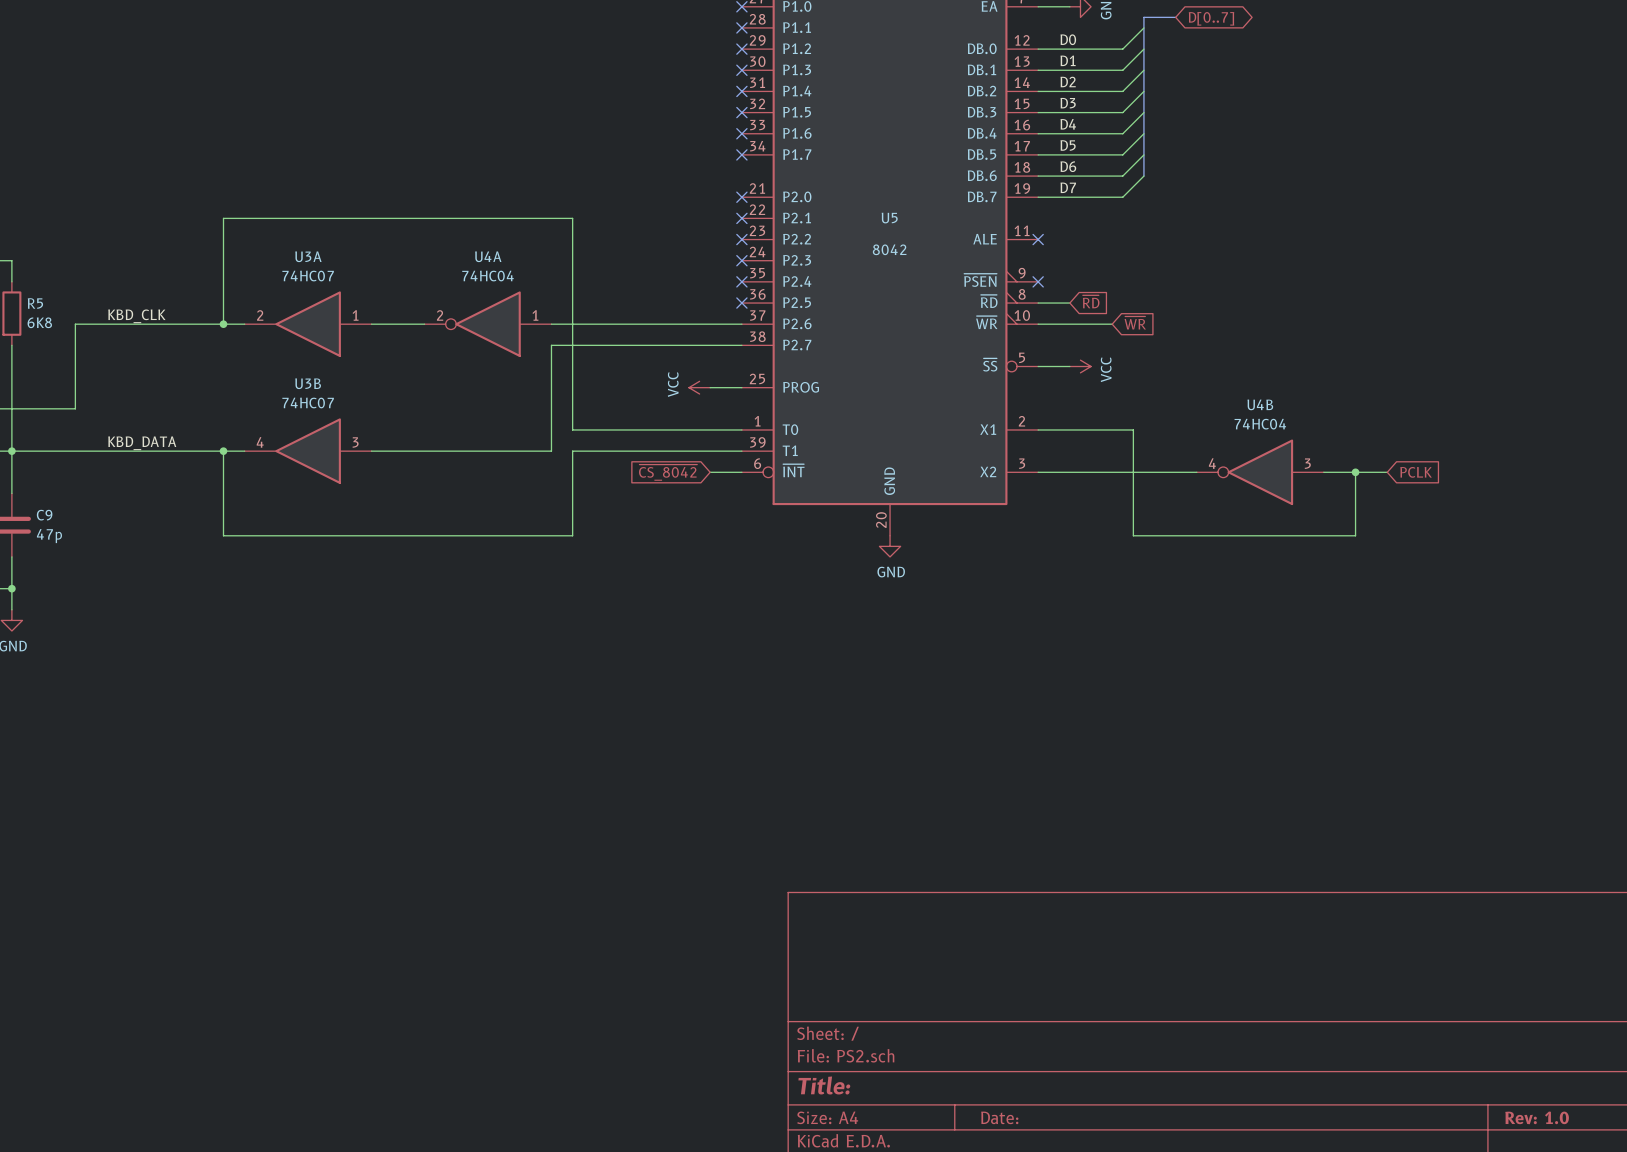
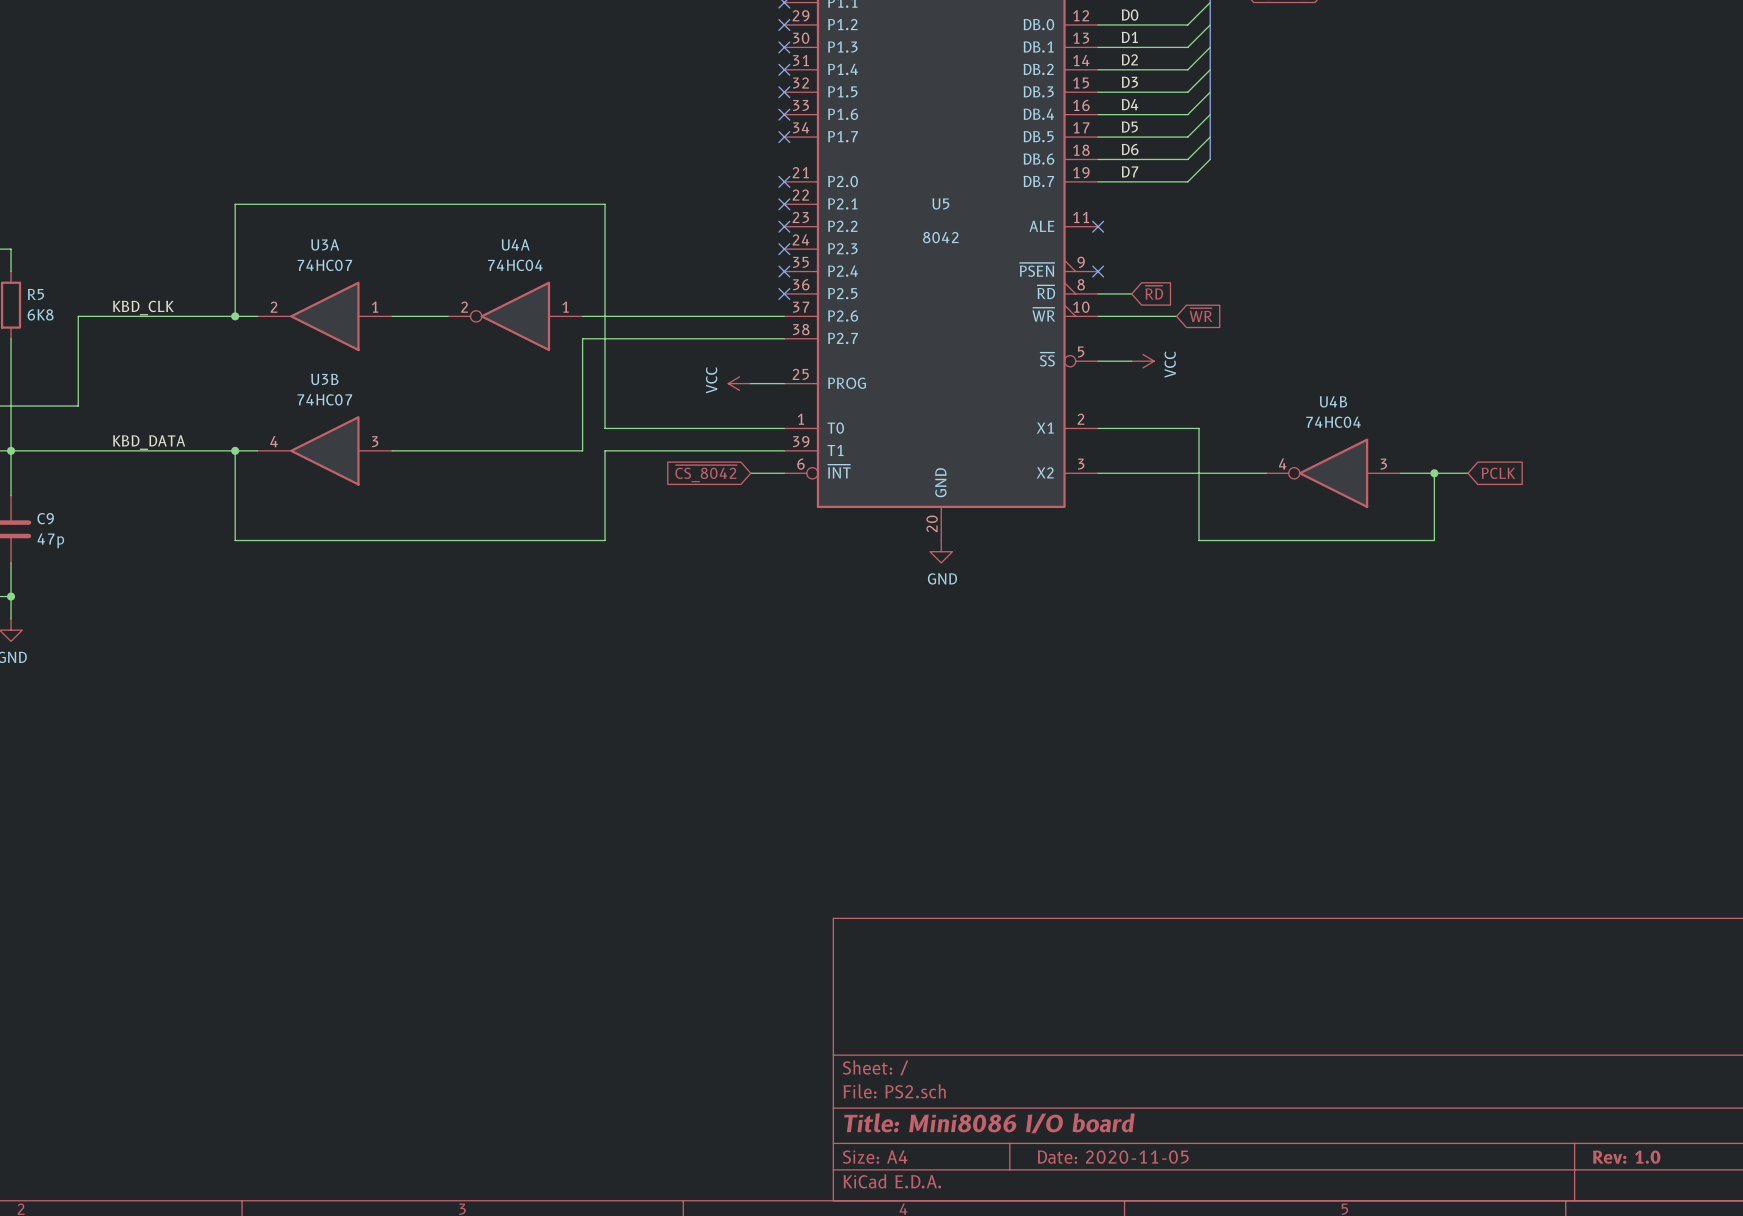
title block: Title: (824, 1085) -> Title: Mini8086 I/O board (989, 1123)
title block: Date: (999, 1117) -> Date: 2020-11-05 (1113, 1157)

